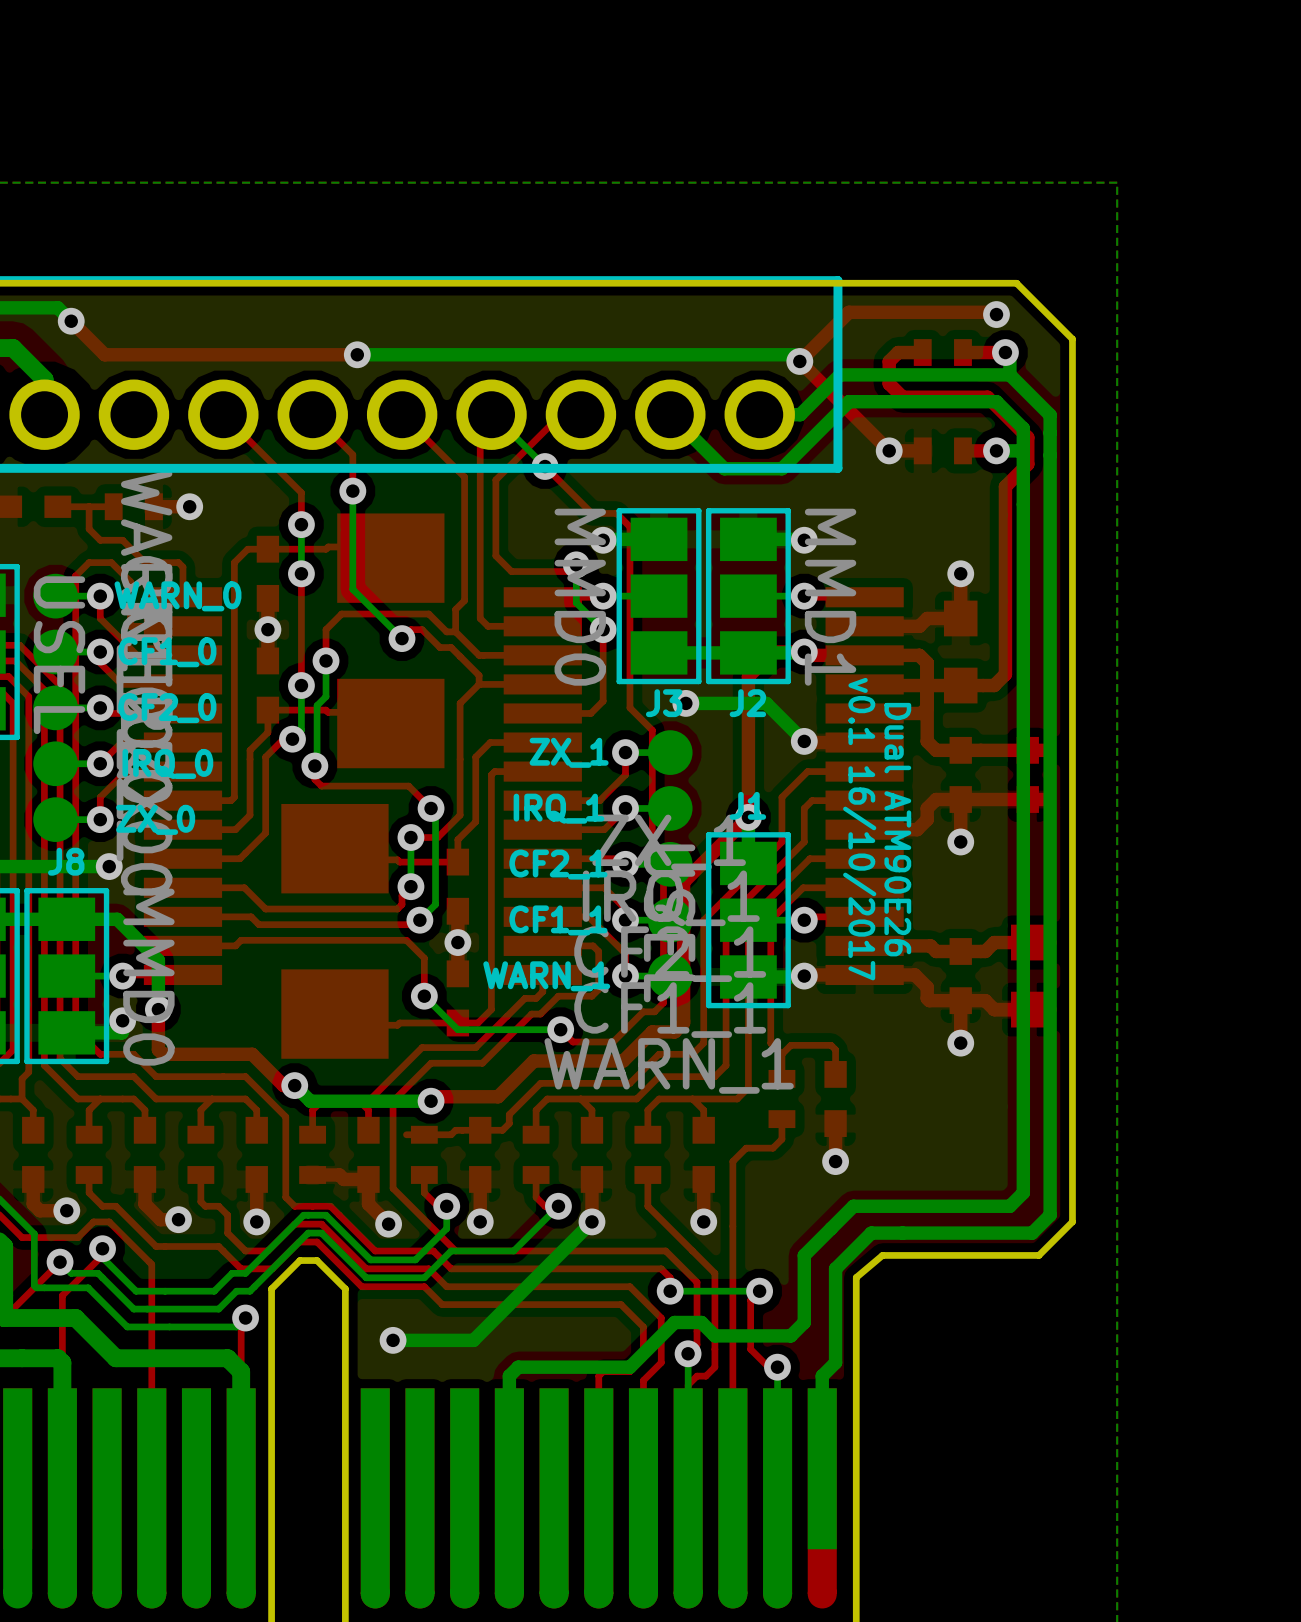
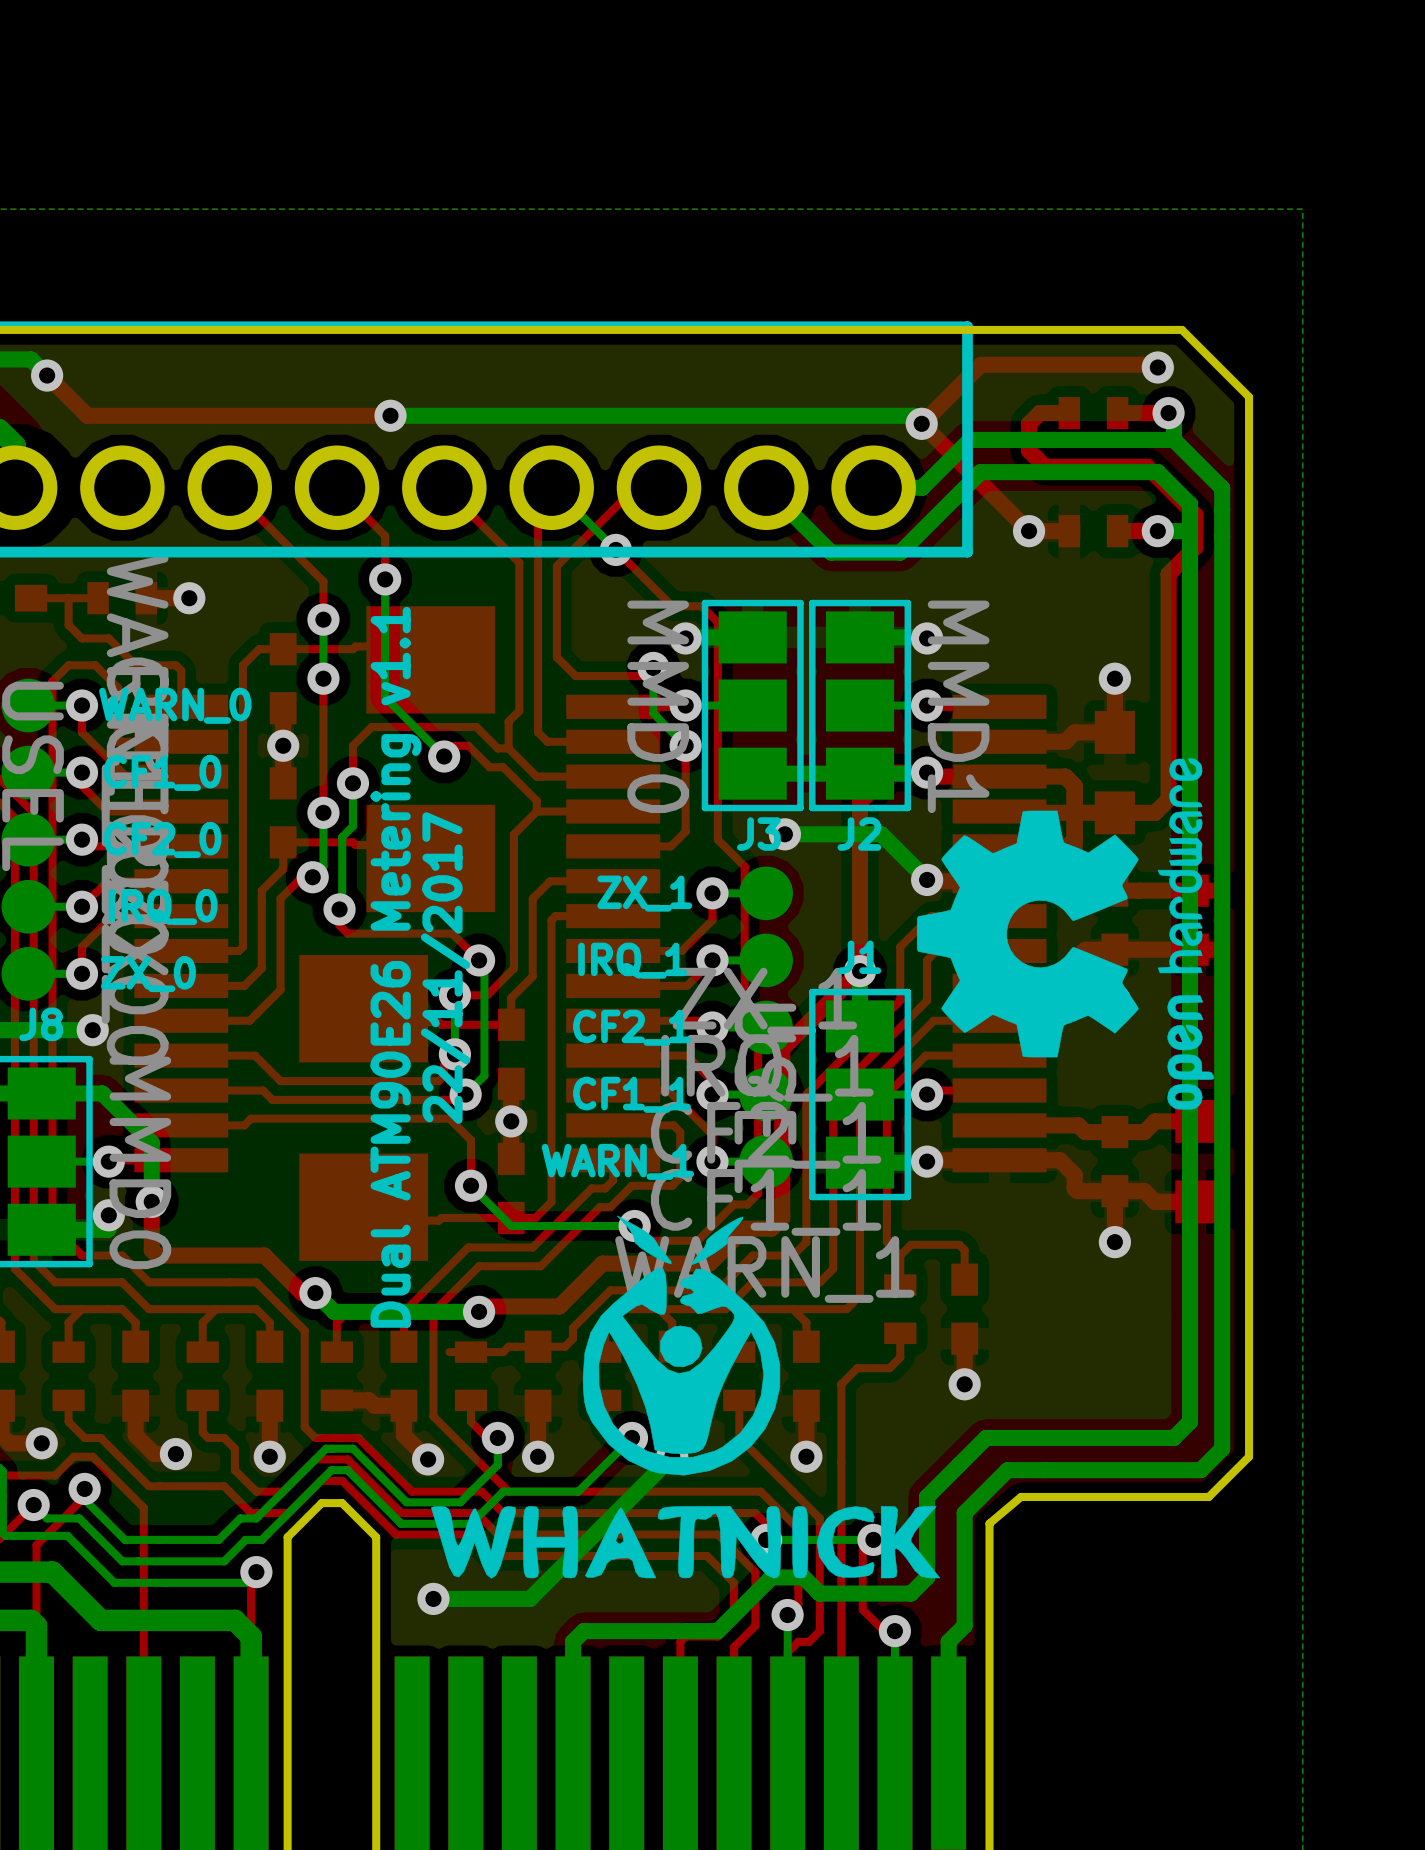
drawing: none -> [916, 758, 1215, 1110]
text: none -> Dual ATM90E26 Metering v1.1 (396, 967)
text: none -> 22/11/2017 (445, 968)
text: v0.1 16/10/2017 (859, 829) -> none
text: Dual ATM90E26 (897, 829) -> none
drawing: none -> [431, 1215, 941, 1579]

